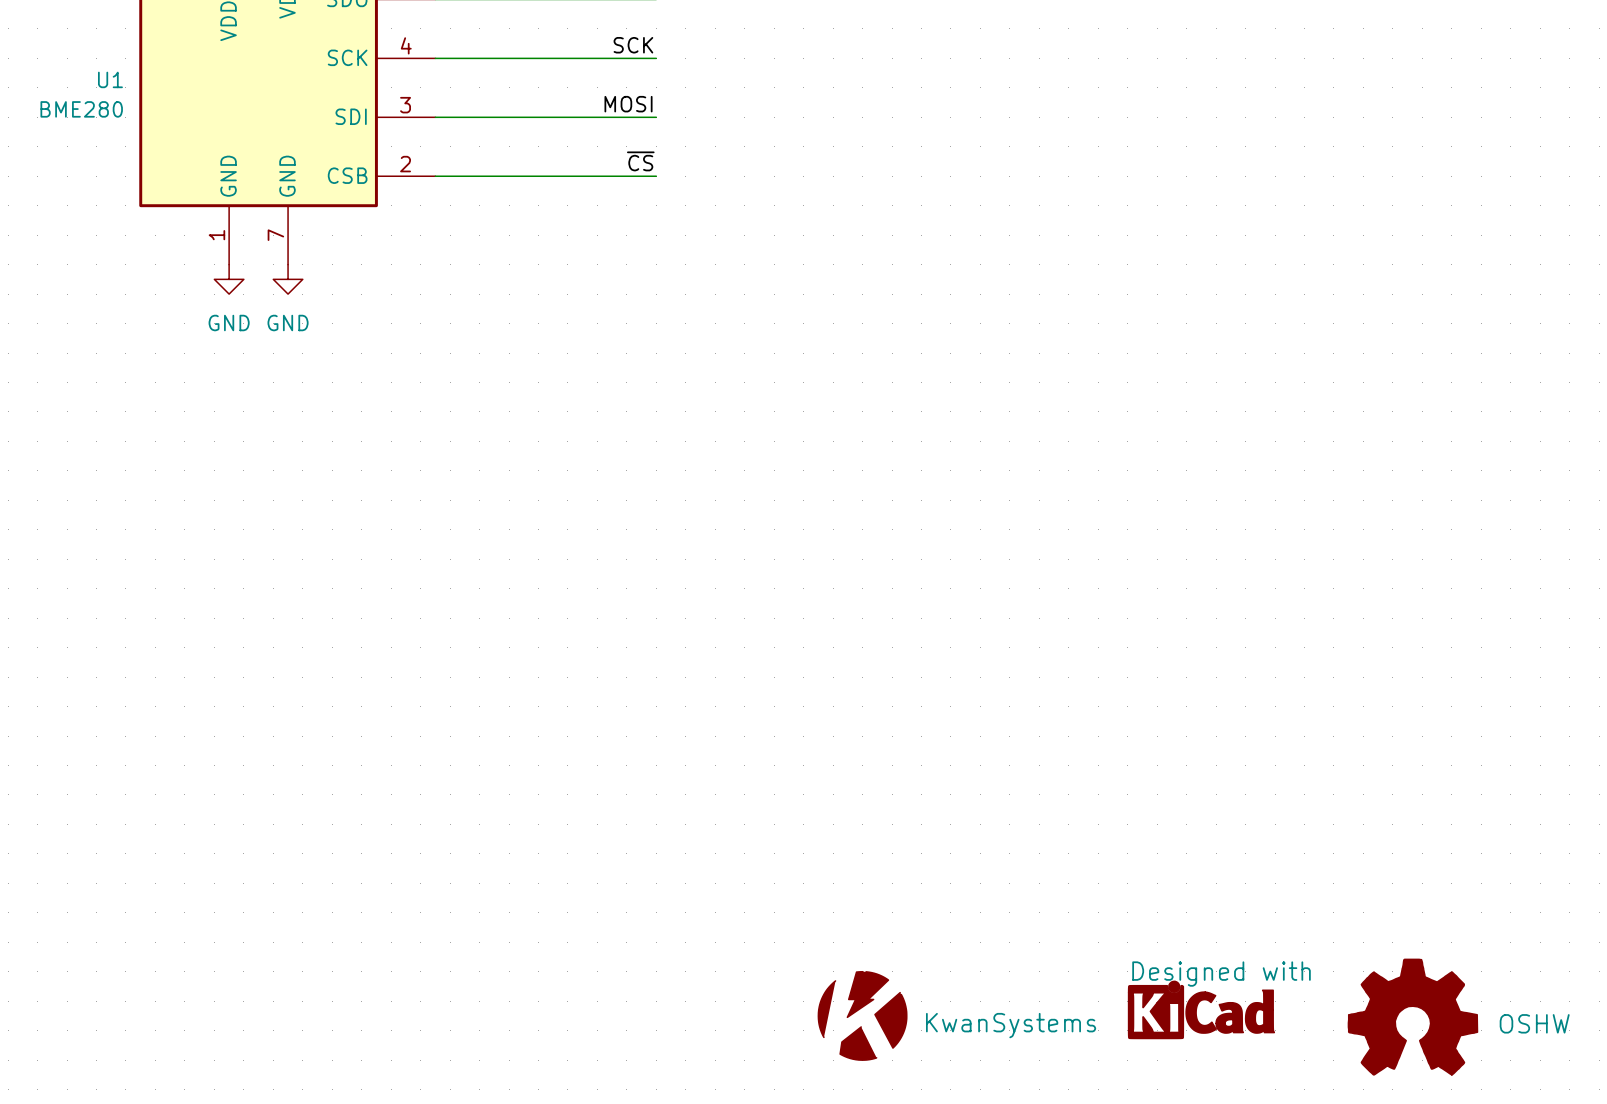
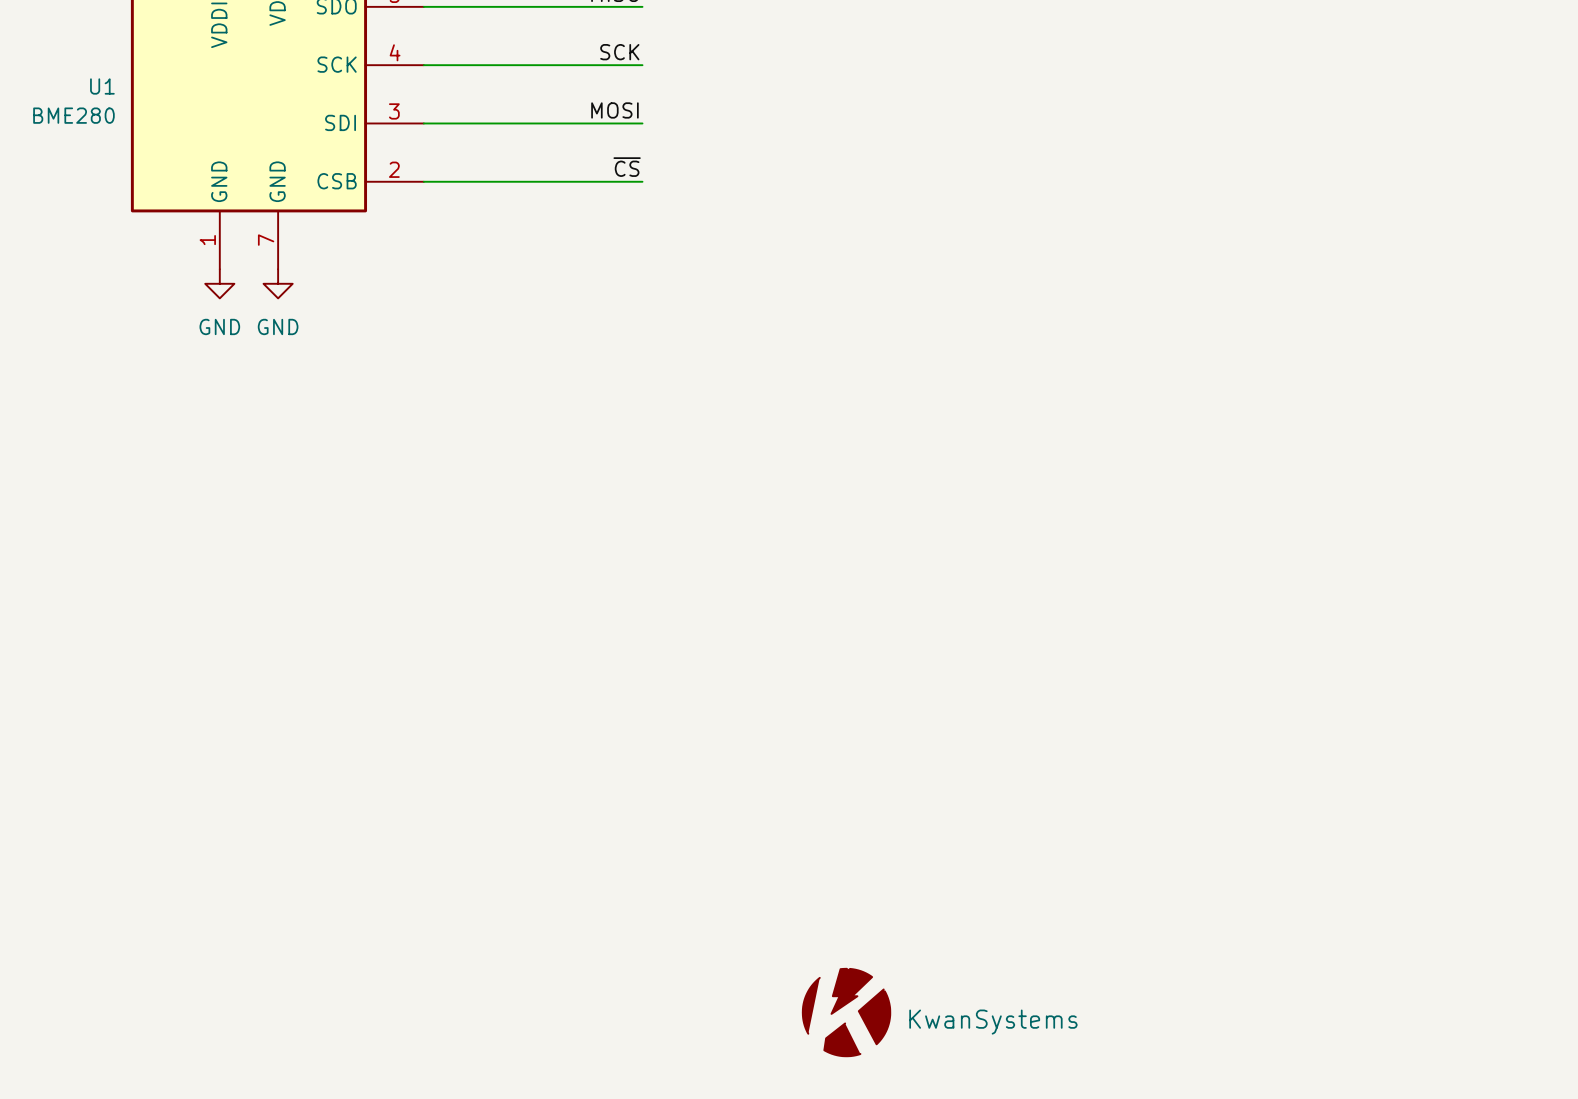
part: Designed with (1201, 1009) -> none
part: OSHW (1412, 1017) -> none

